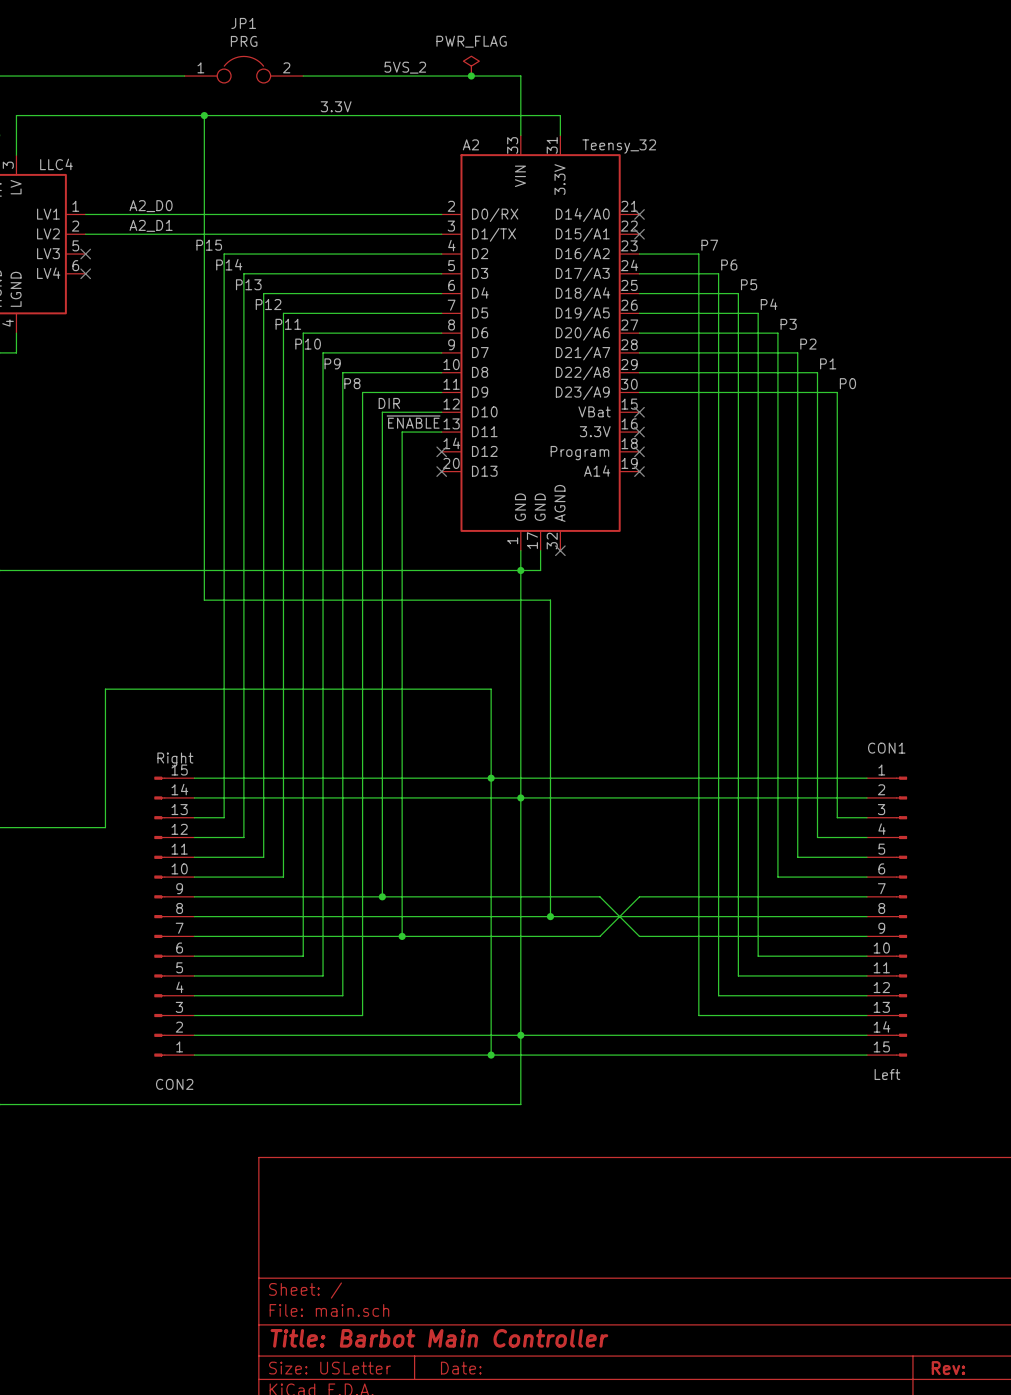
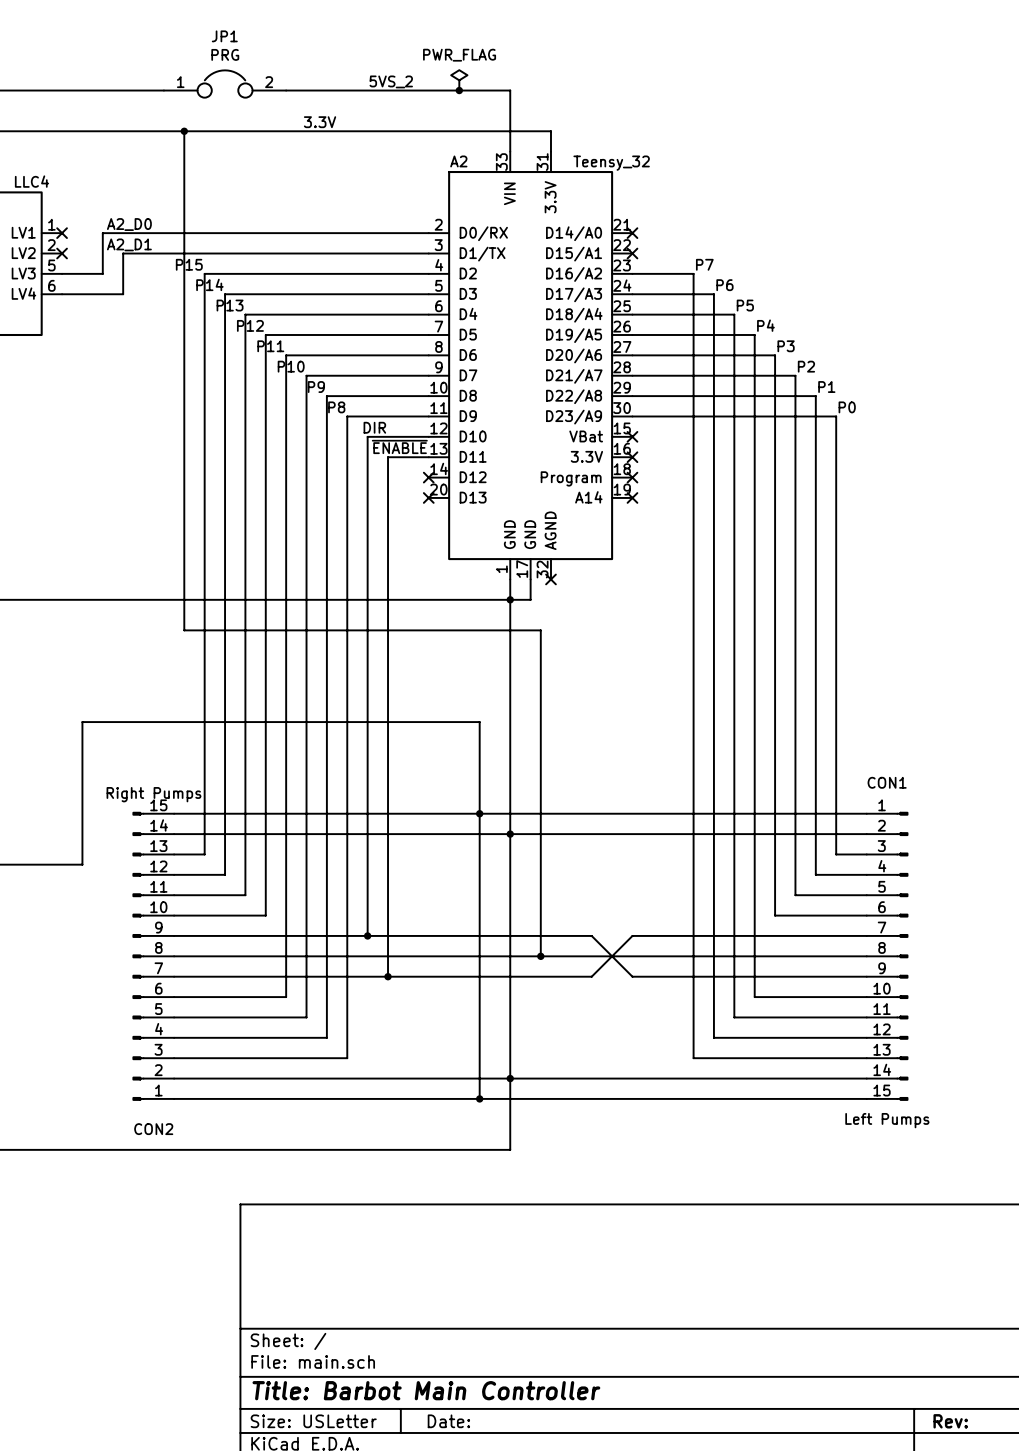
wire: (85, 214) (125, 214) -> (62, 273) (102, 273) (102, 233)
no-connect mark: none -> (62, 233)
wire: (85, 234) (145, 234) -> (62, 294) (123, 294) (123, 253)
no-connect mark: none -> (62, 253)
no-connect mark: (85, 254) -> none
no-connect mark: (85, 273) -> none
CON2 value: Right (175, 759) -> Right Pumps (153, 794)
CON1 value: Left (887, 1074) -> Left Pumps (887, 1120)

